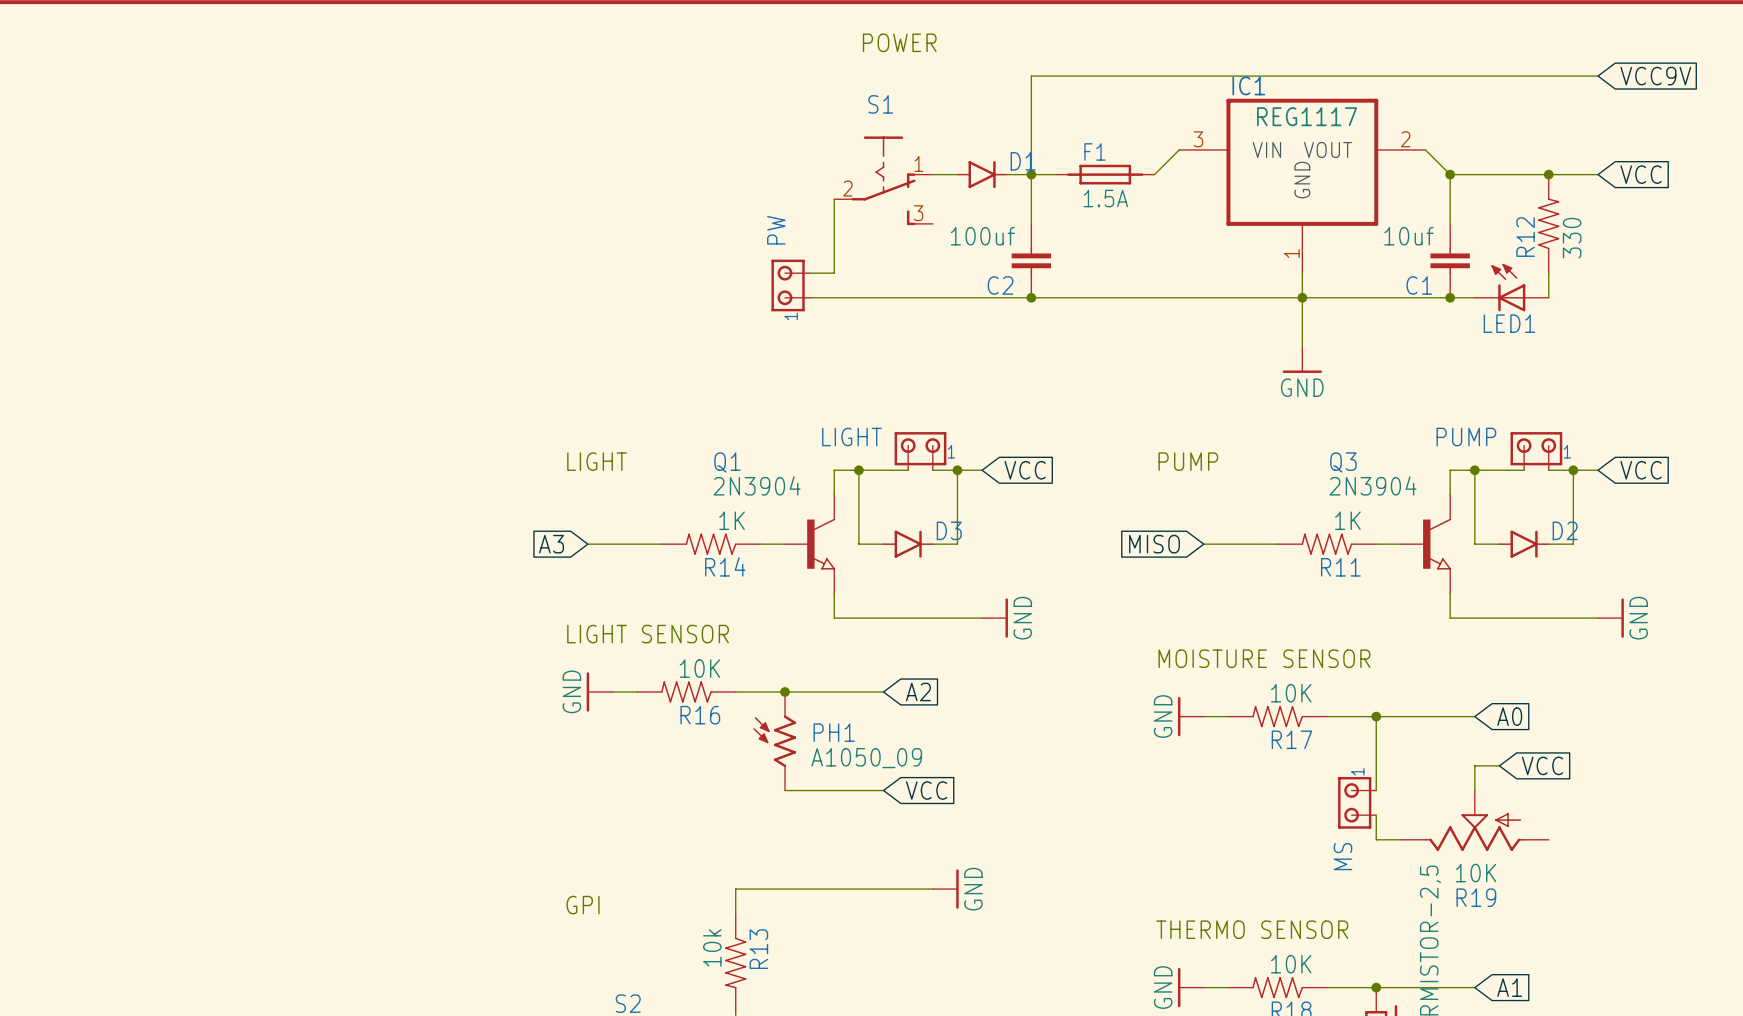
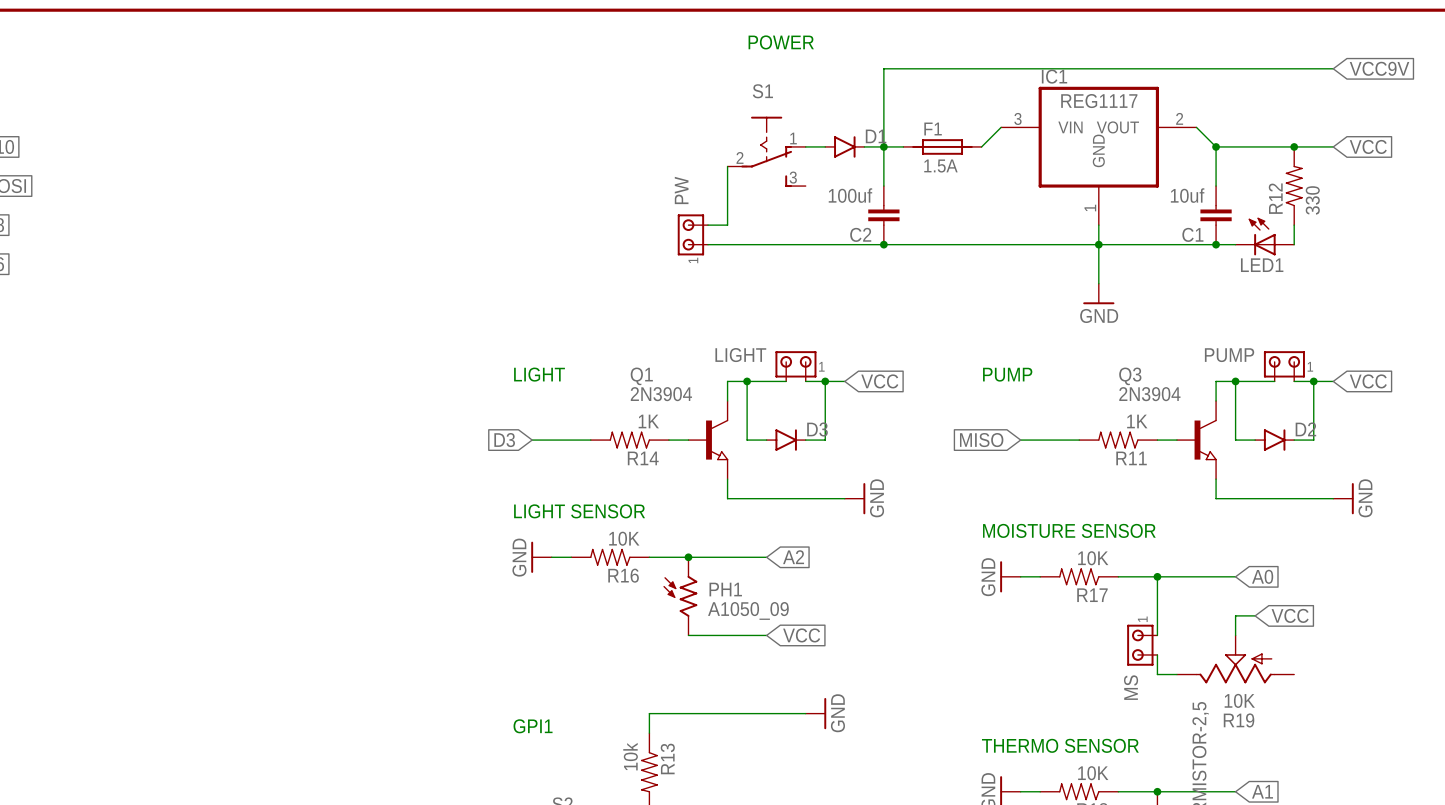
global label: A3 (551, 544) -> D3 (504, 440)
text: GPI (583, 905) -> GPI1 (533, 726)

